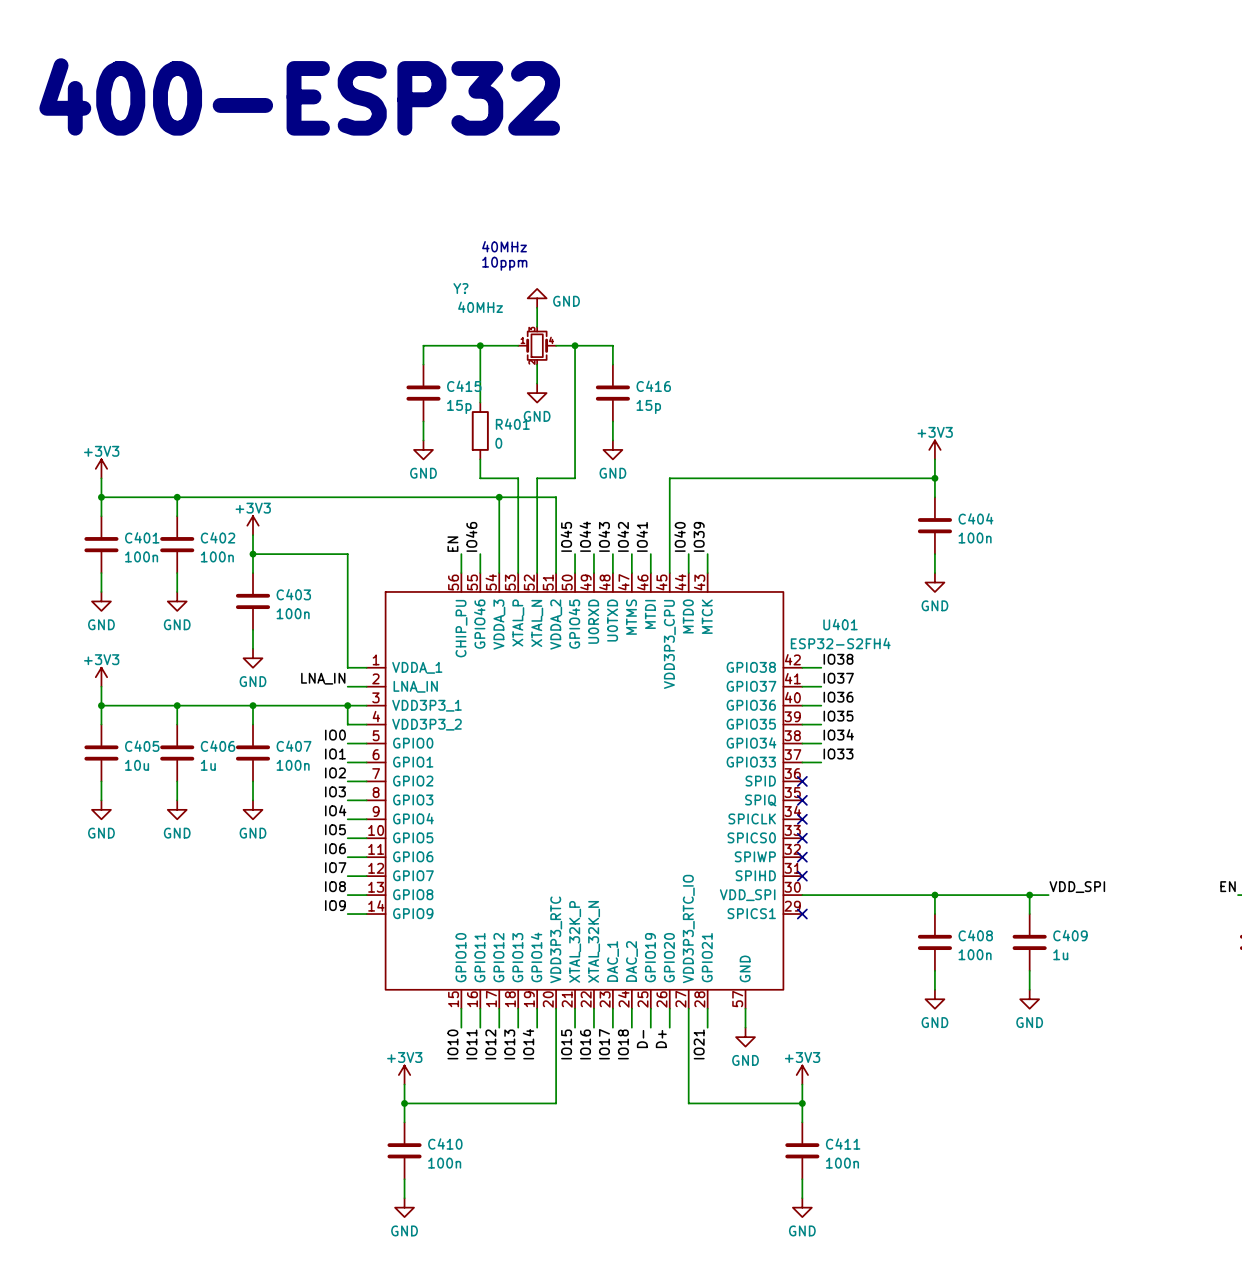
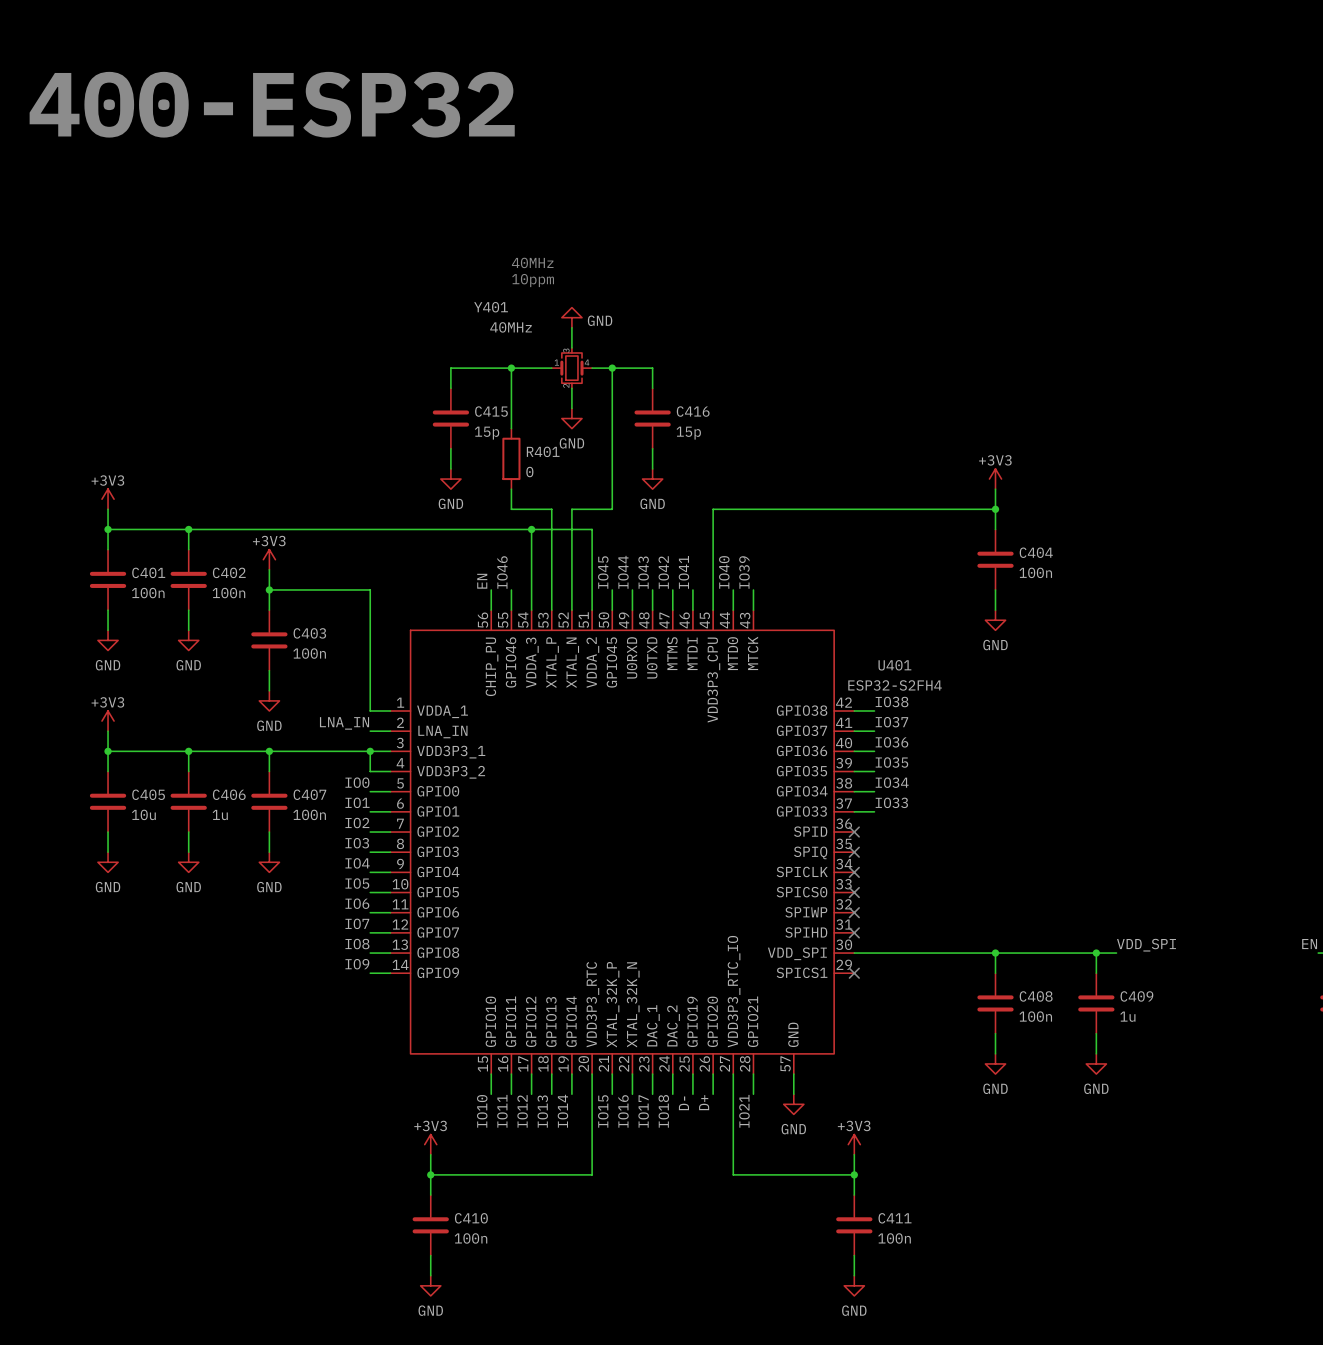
Y? name: Y? (460, 288) -> Y401 (491, 307)

